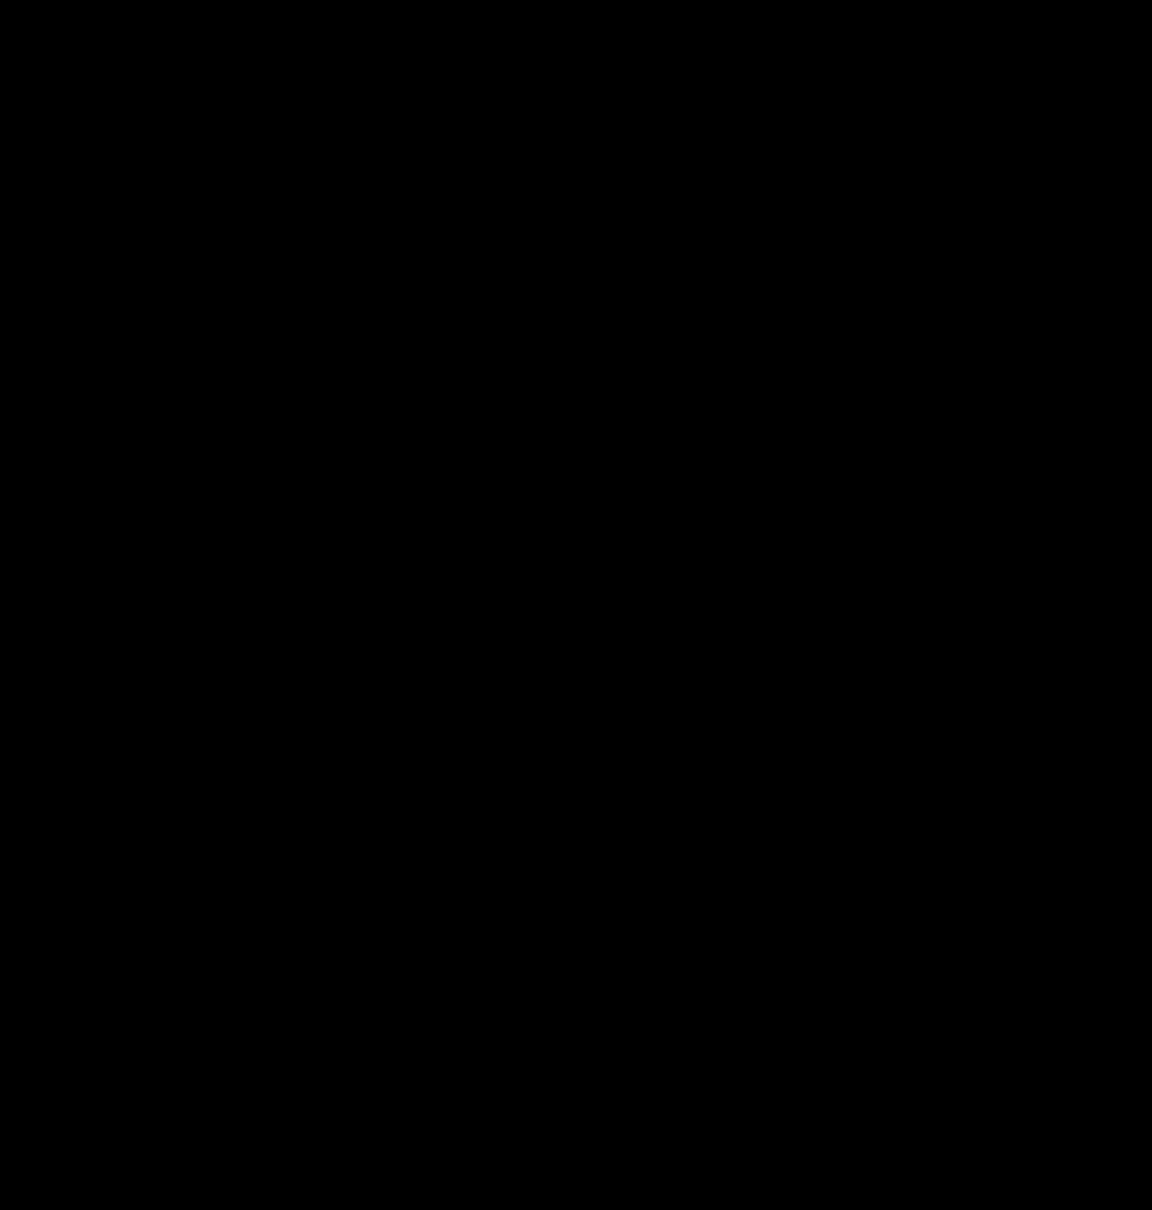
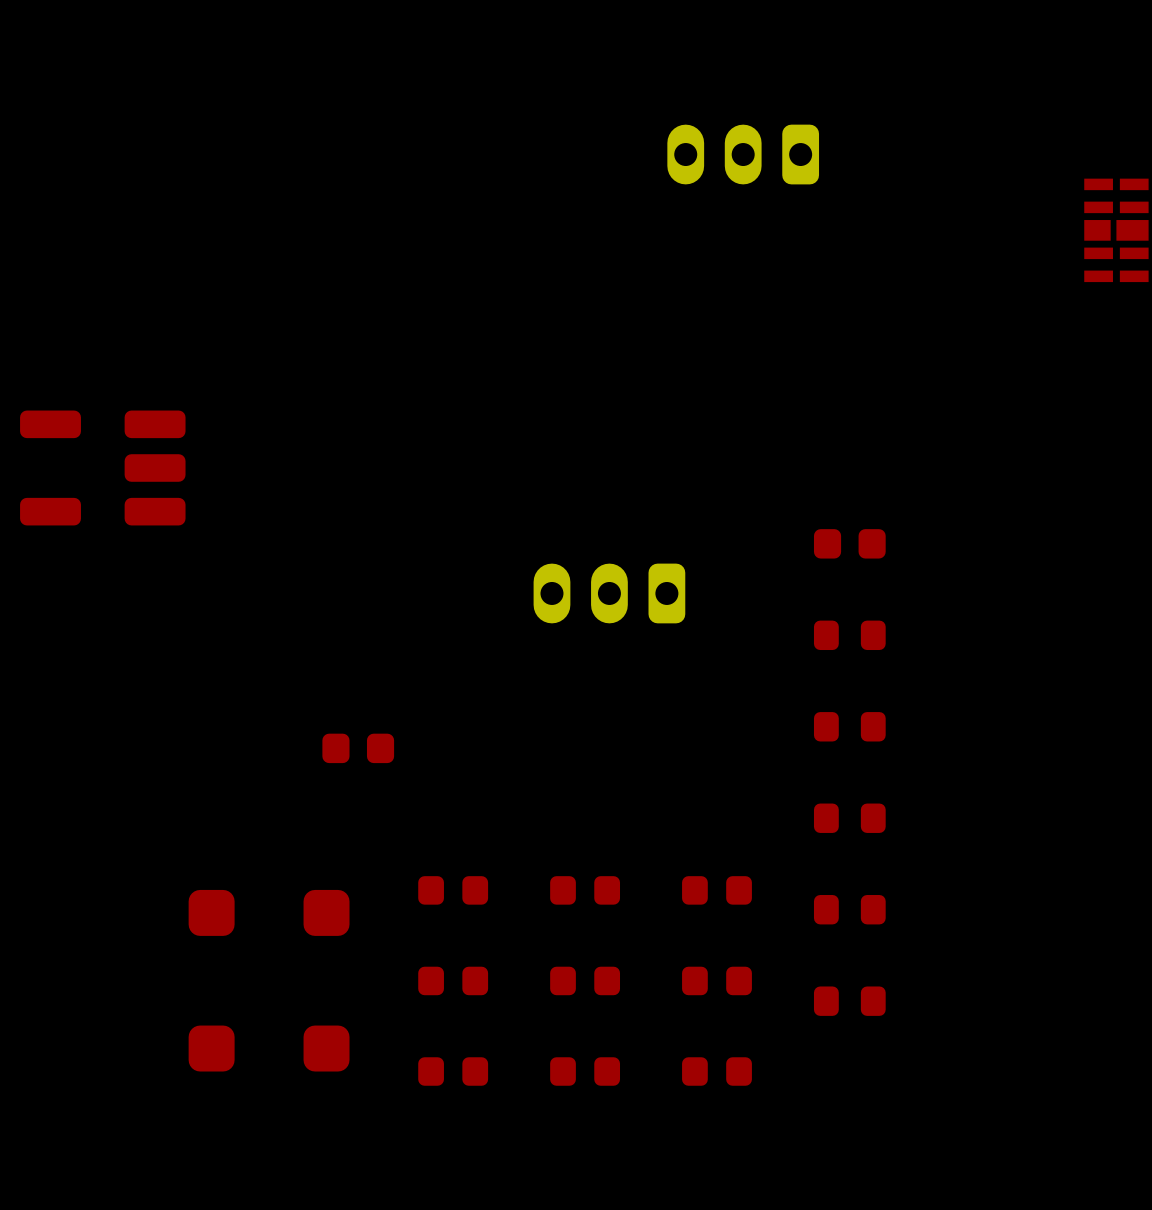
part: none -> (743, 154)
part: none -> (1116, 230)
part: none -> (102, 467)
part: none -> (849, 543)
part: none -> (609, 593)
part: none -> (849, 635)
part: none -> (849, 726)
part: none -> (358, 748)
part: none -> (849, 818)
part: none -> (453, 890)
part: none -> (585, 890)
part: none -> (716, 890)
part: none -> (849, 909)
part: none -> (269, 912)
part: none -> (453, 980)
part: none -> (585, 980)
part: none -> (716, 980)
part: none -> (849, 1001)
part: none -> (269, 1048)
part: none -> (453, 1071)
part: none -> (585, 1071)
part: none -> (716, 1071)

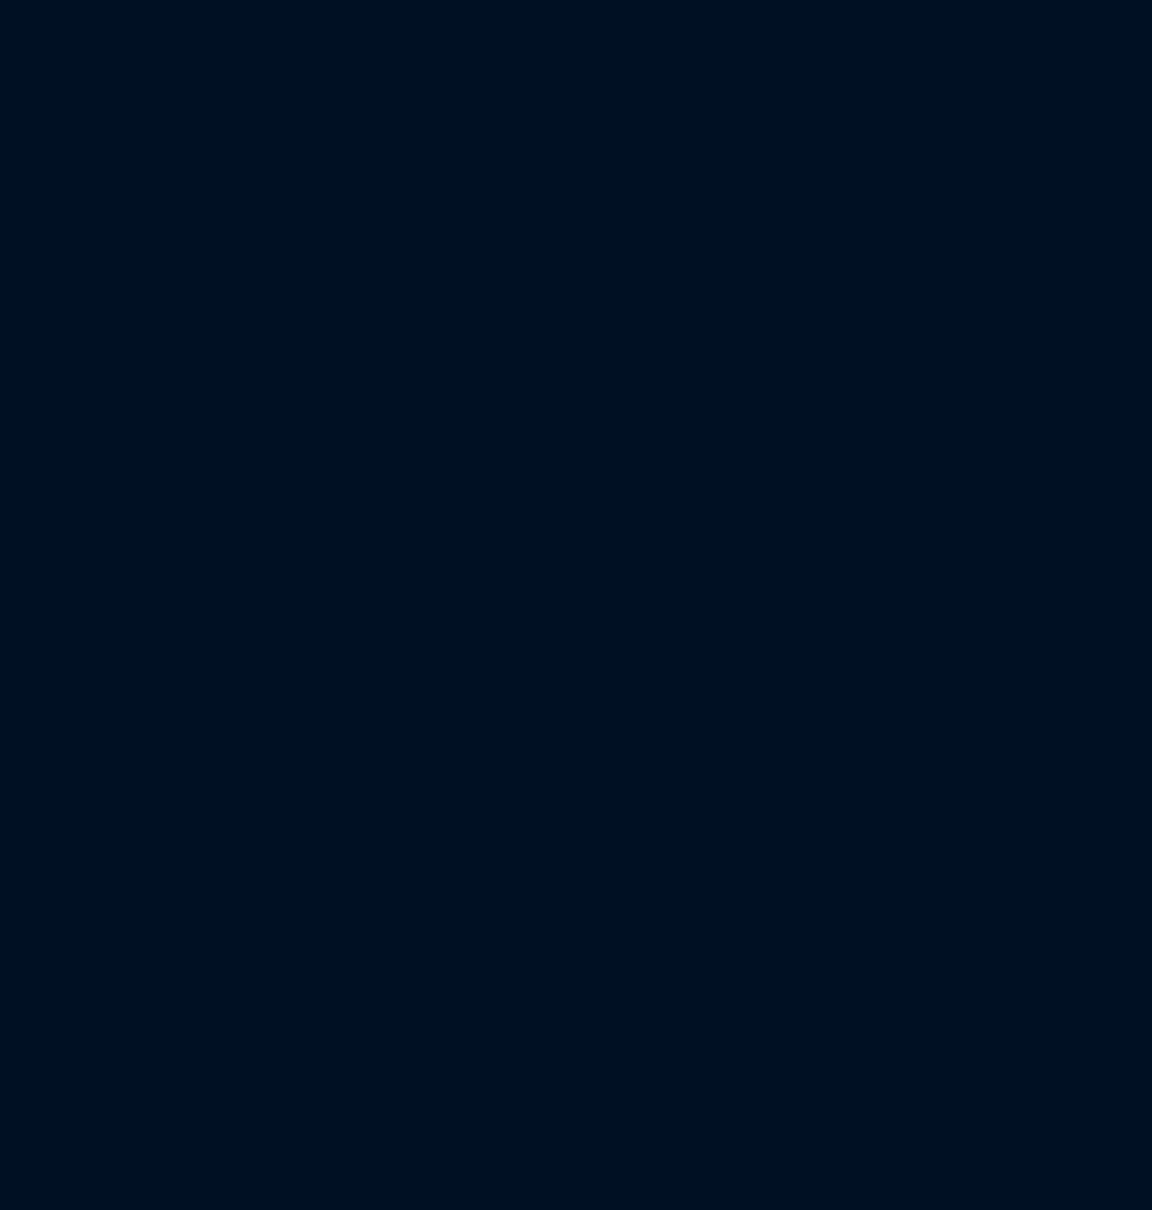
part: (743, 154) -> none
part: (1116, 230) -> none
part: (102, 467) -> none
part: (849, 543) -> none
part: (609, 593) -> none
part: (849, 635) -> none
part: (849, 726) -> none
part: (358, 748) -> none
part: (849, 818) -> none
part: (453, 890) -> none
part: (585, 890) -> none
part: (716, 890) -> none
part: (849, 909) -> none
part: (269, 912) -> none
part: (453, 980) -> none
part: (585, 980) -> none
part: (716, 980) -> none
part: (849, 1001) -> none
part: (269, 1048) -> none
part: (453, 1071) -> none
part: (585, 1071) -> none
part: (716, 1071) -> none

